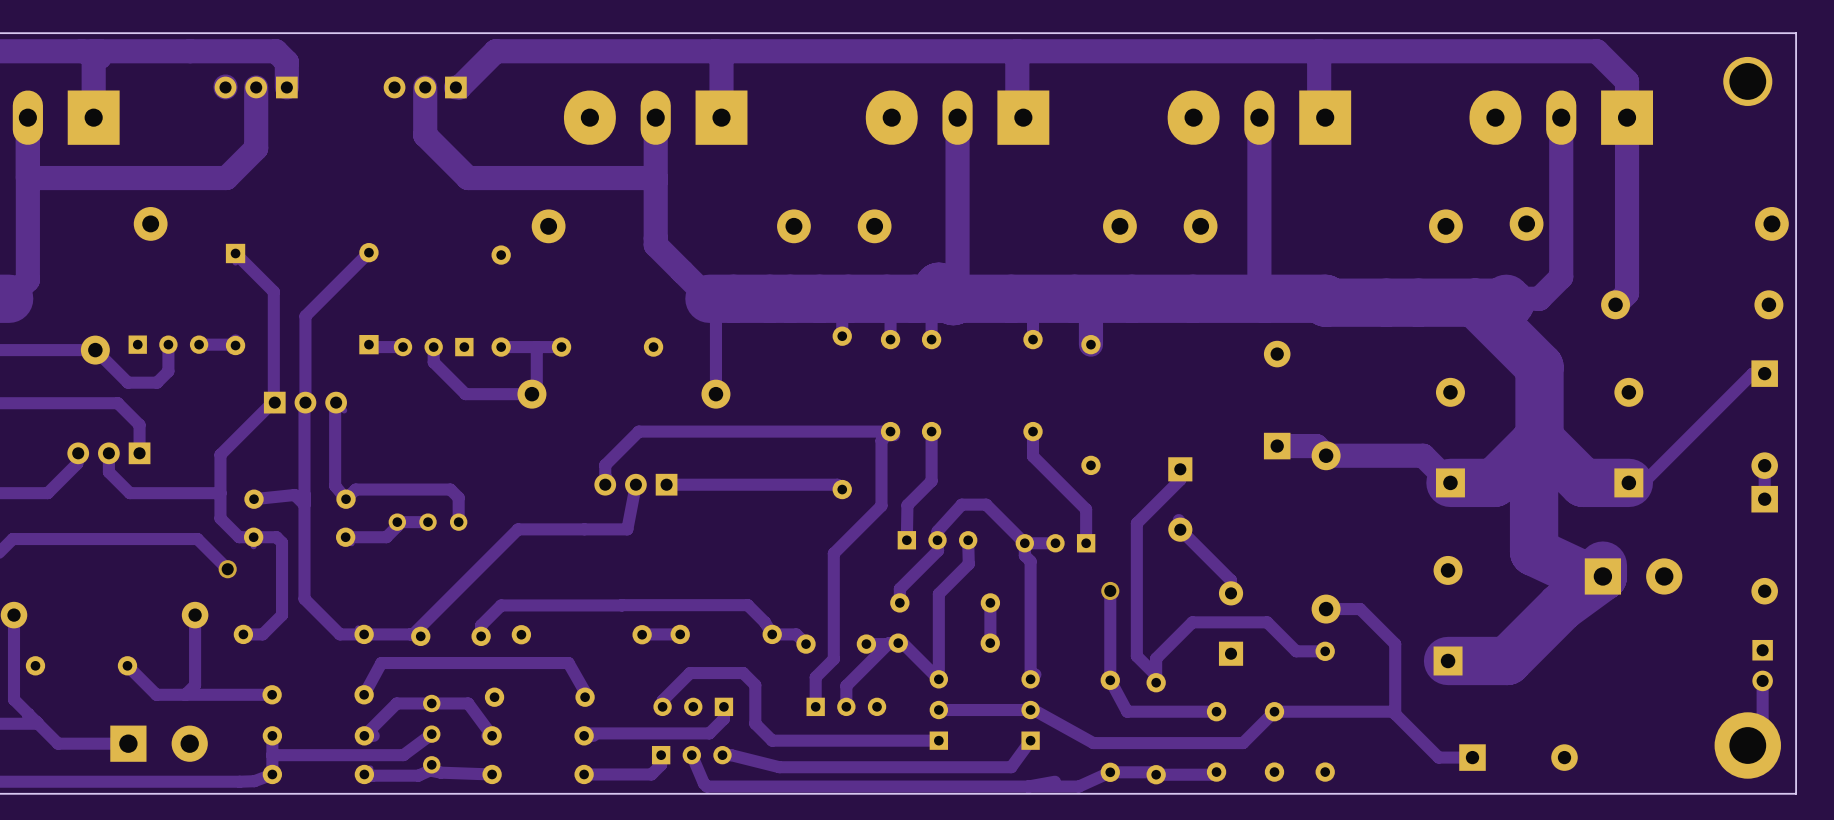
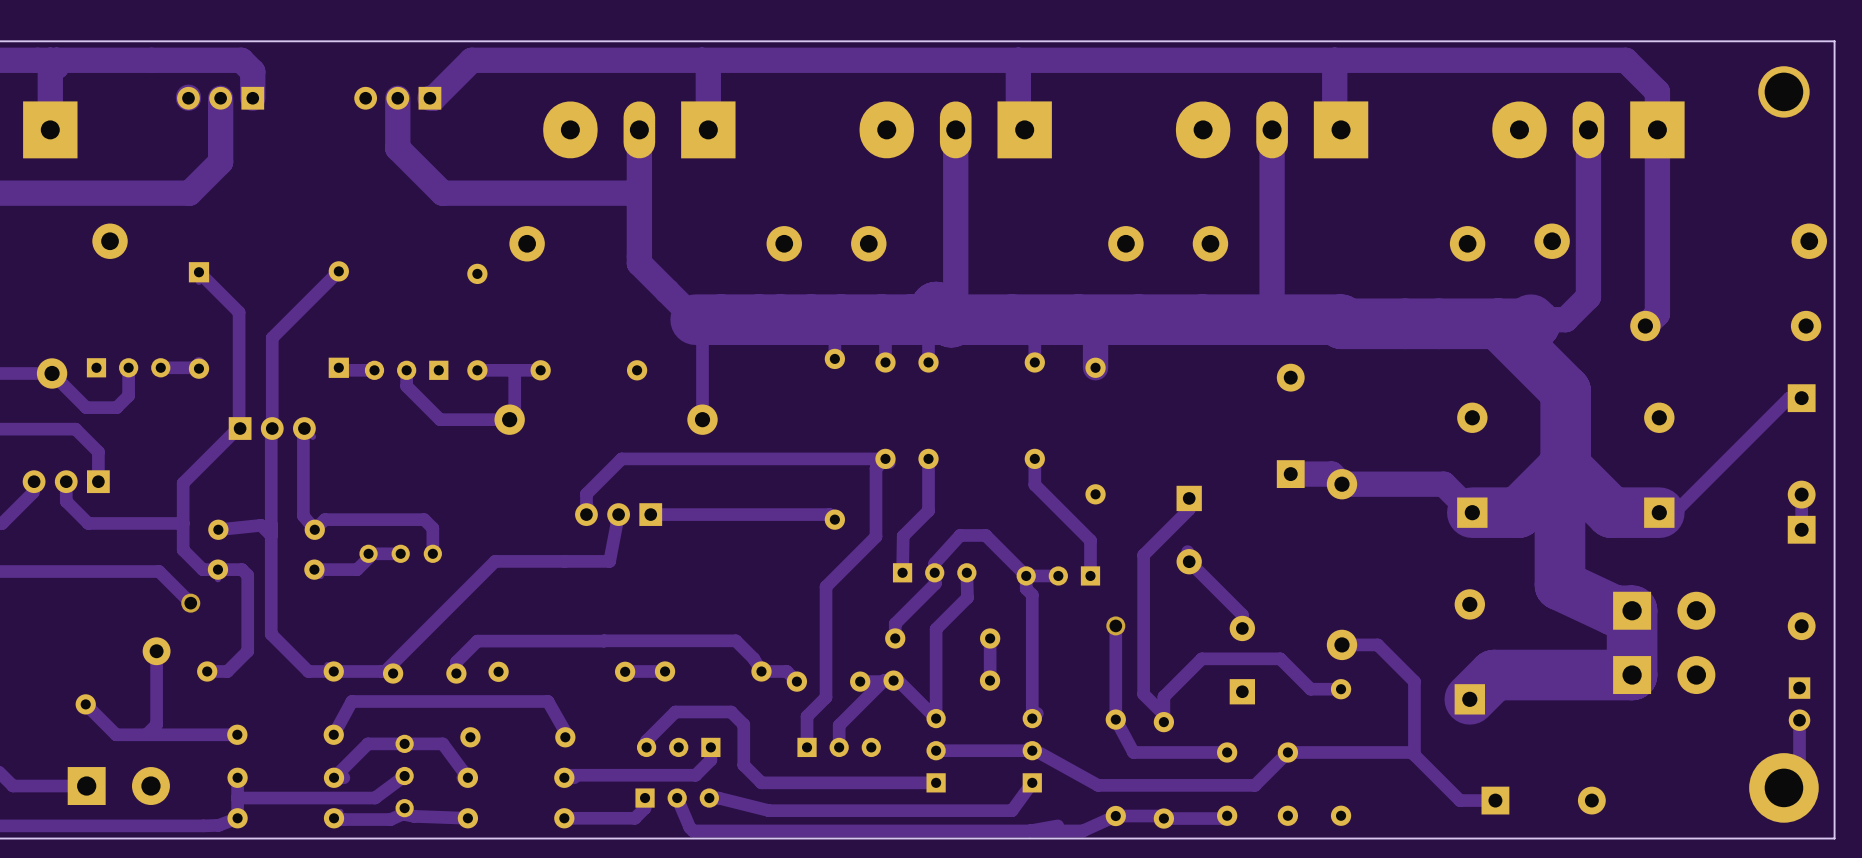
track: (1602, 565) (1602, 576) (1561, 606) (1507, 660) (1448, 660) -> (1632, 610) (1632, 675) (1494, 675) (1469, 699)
part: (1633, 576) -> none
part: none -> (1664, 642)

